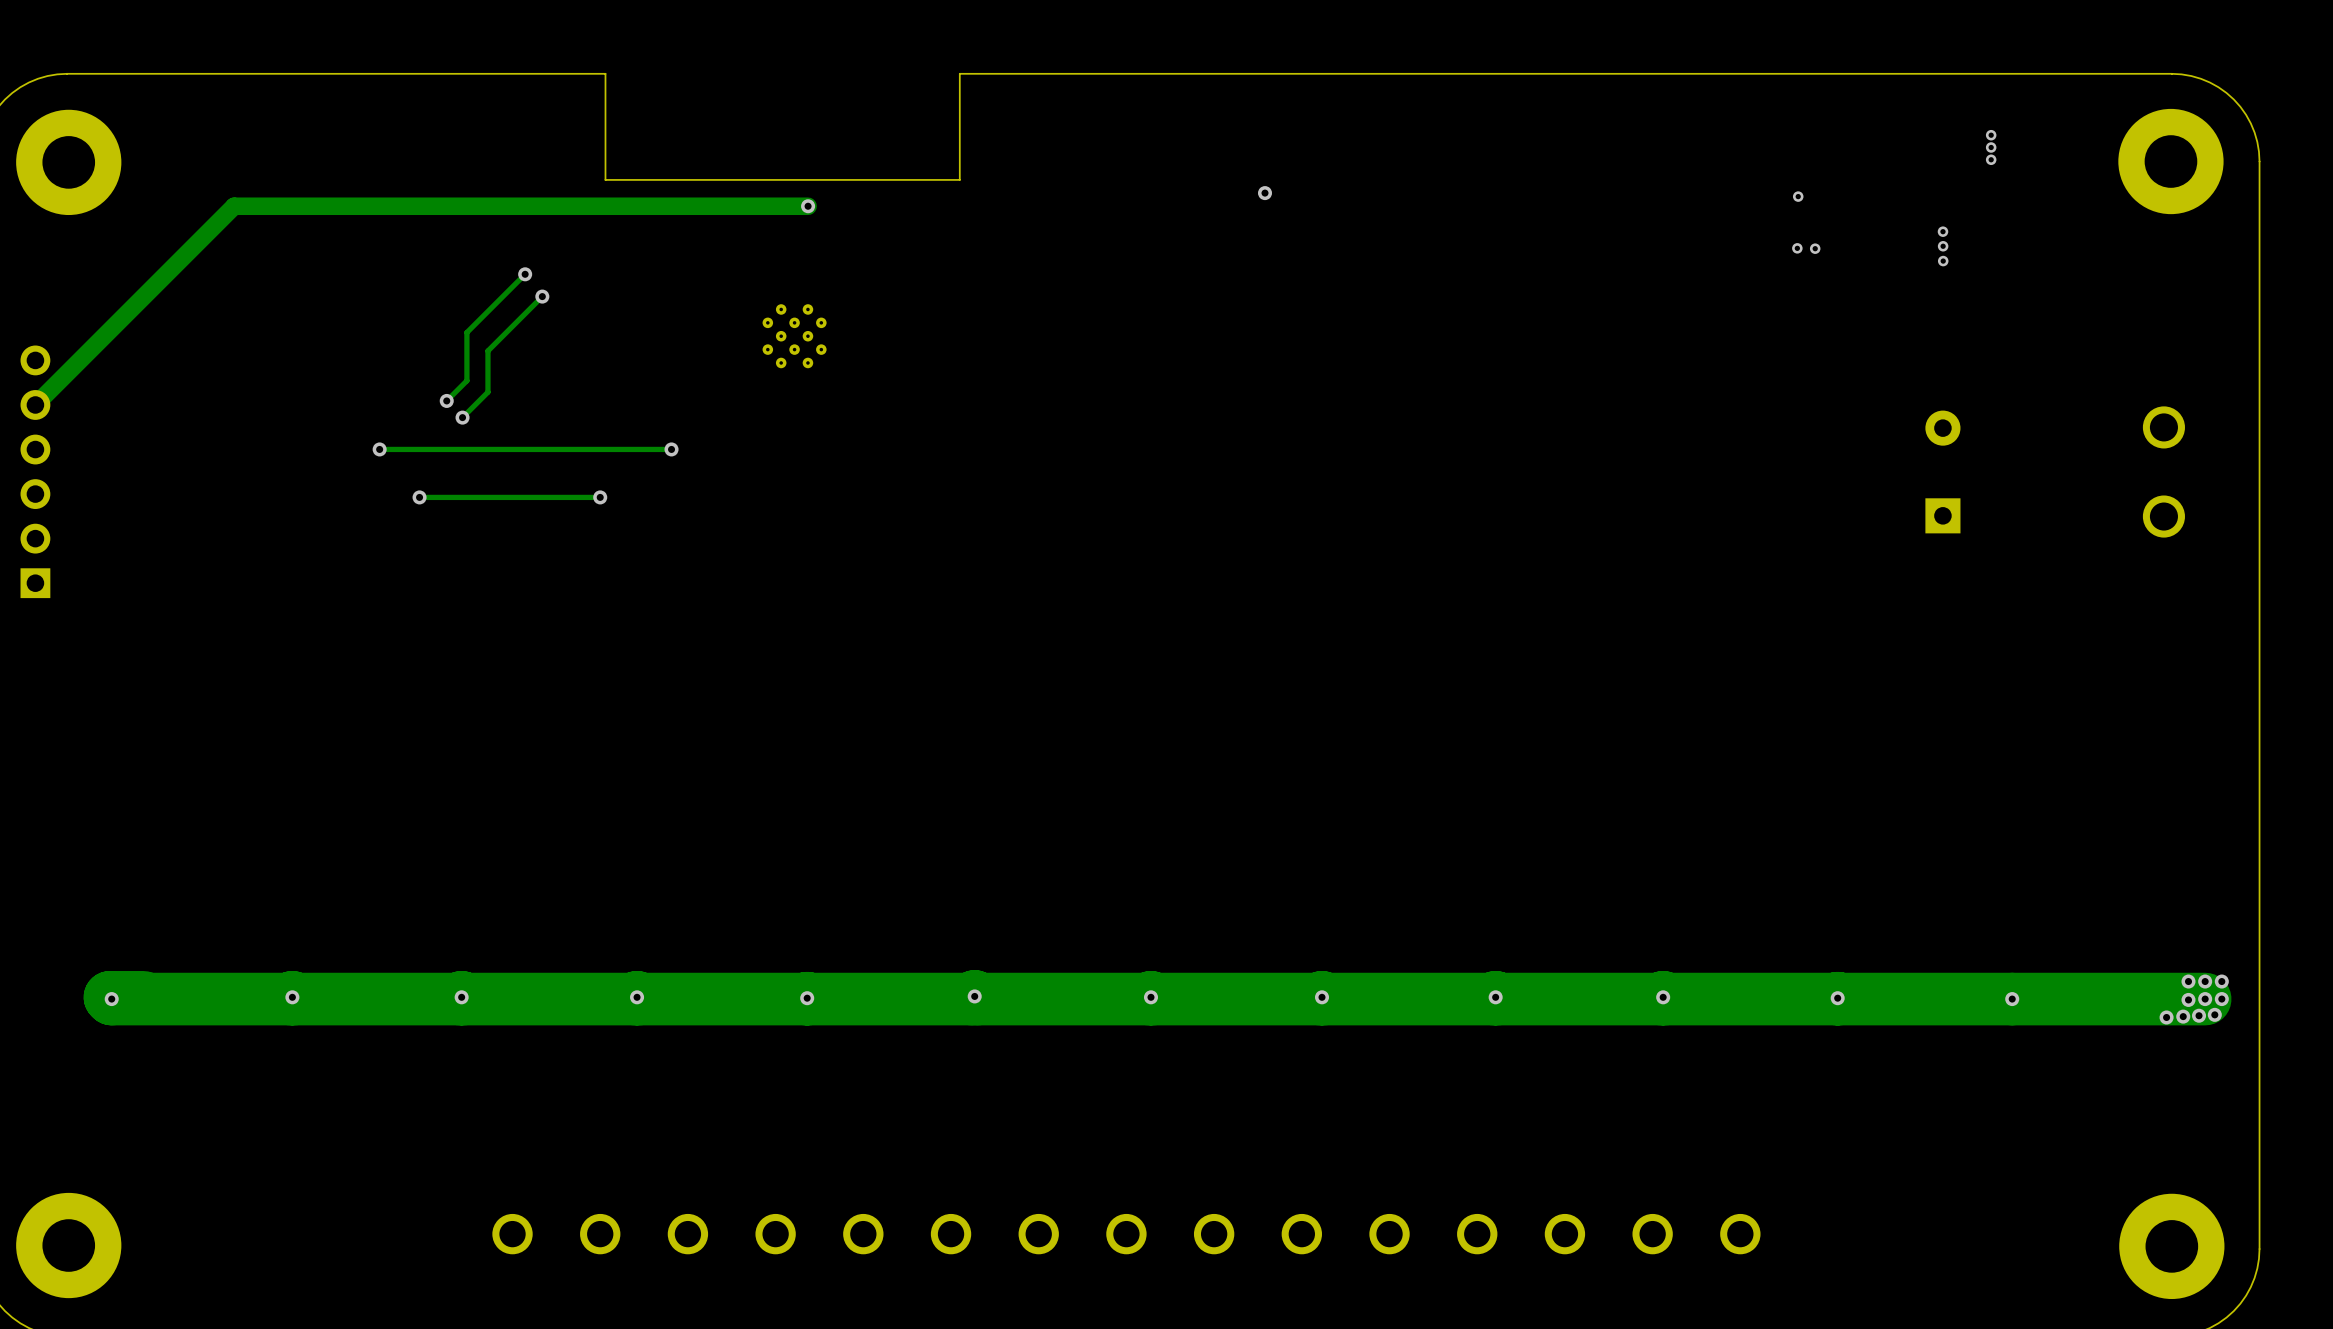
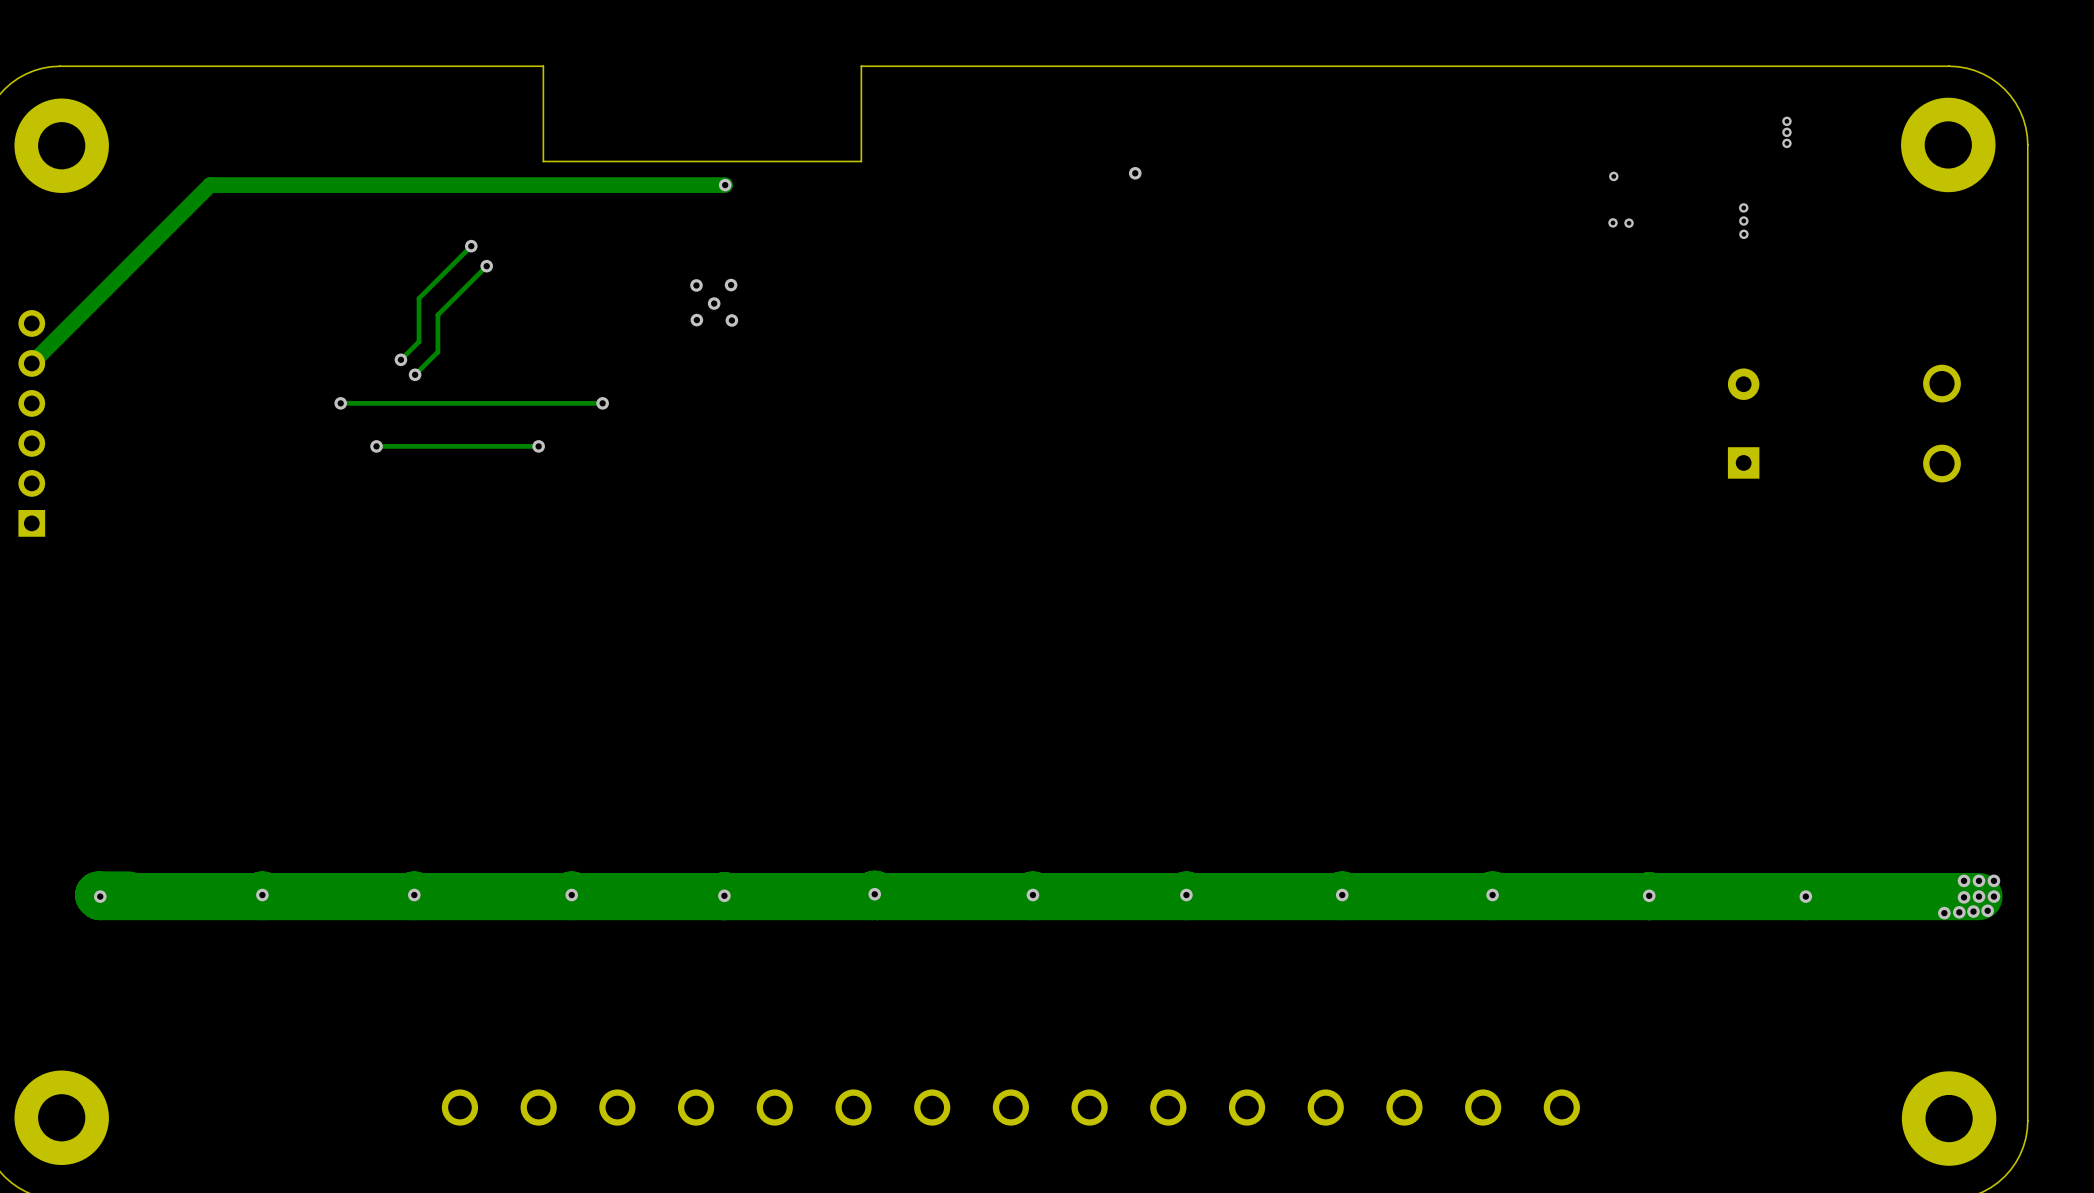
via: none -> (731, 285)
via: none -> (696, 285)
part: (794, 336) -> none
via: none -> (714, 303)
via: none -> (696, 320)
via: none -> (731, 320)

